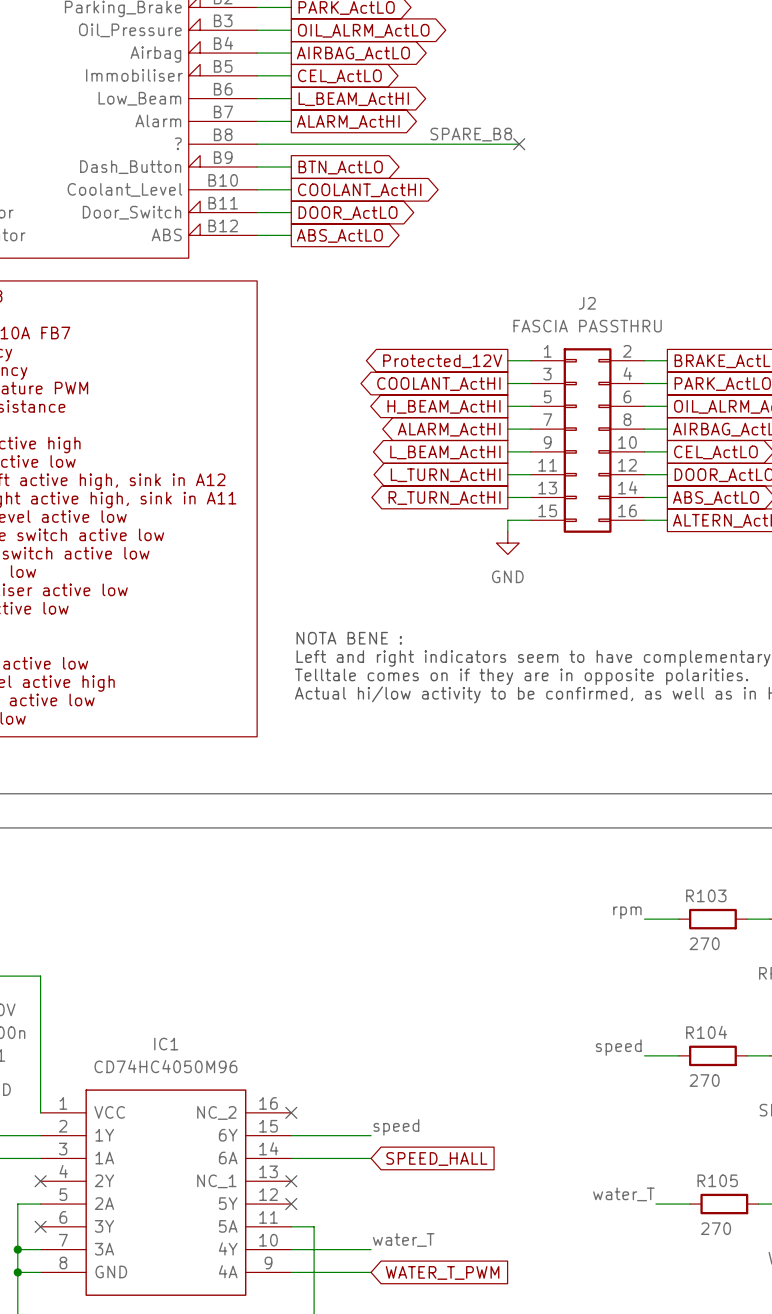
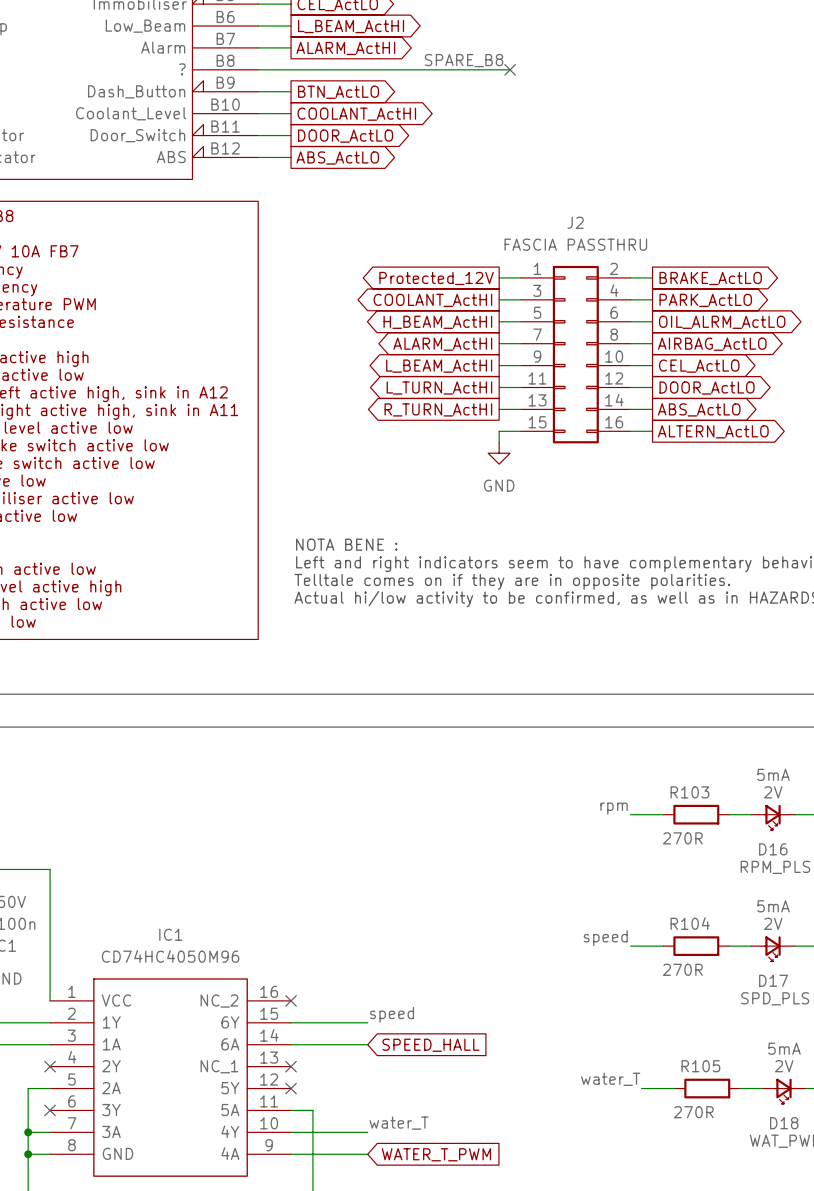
R103 value: 270 (704, 943) -> 270R (682, 838)
R104 value: 270 (704, 1080) -> 270R (682, 969)
R105 value: 270 (716, 1228) -> 270R (693, 1112)

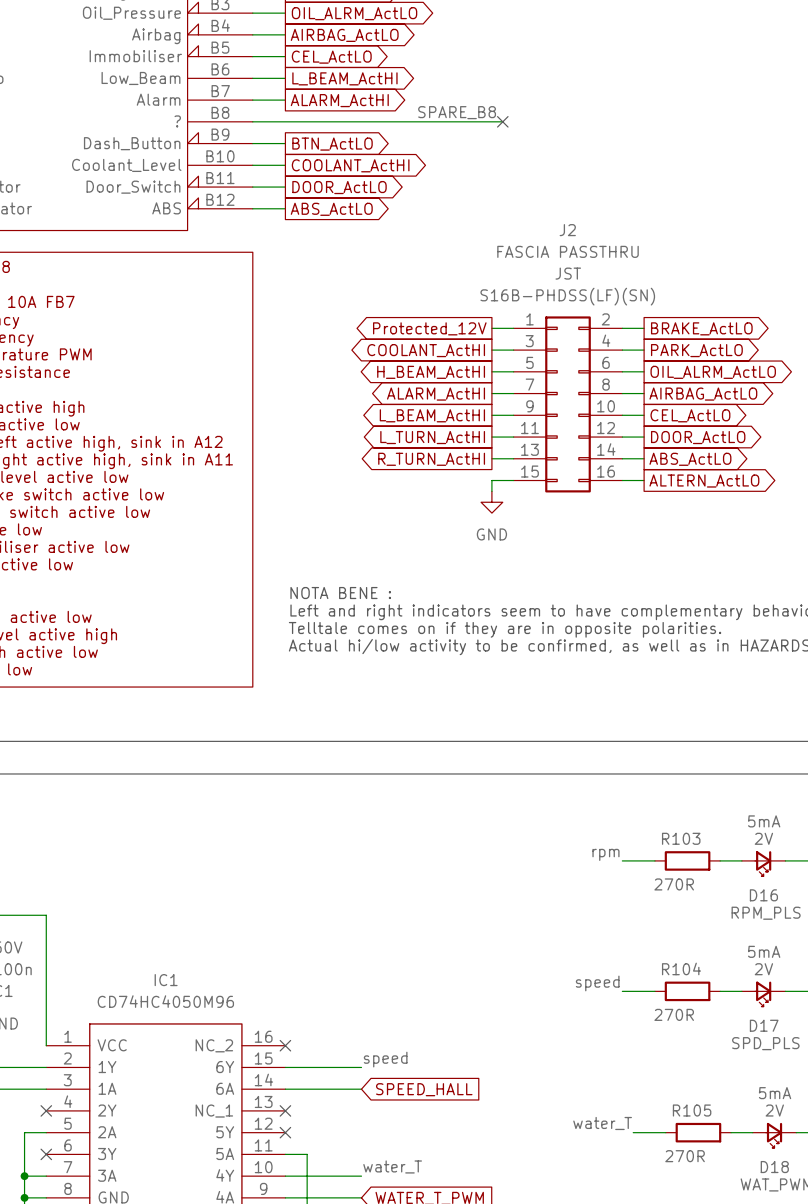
J2 name position: J2 (575, 222) -> J2 (567, 230)
J2 text: none -> JST (568, 273)
J2 value position: FASCIA PASSTHRU (575, 244) -> FASCIA PASSTHRU (568, 251)
J2 text: none -> S16B-PHDSS(LF)(SN) (567, 296)

